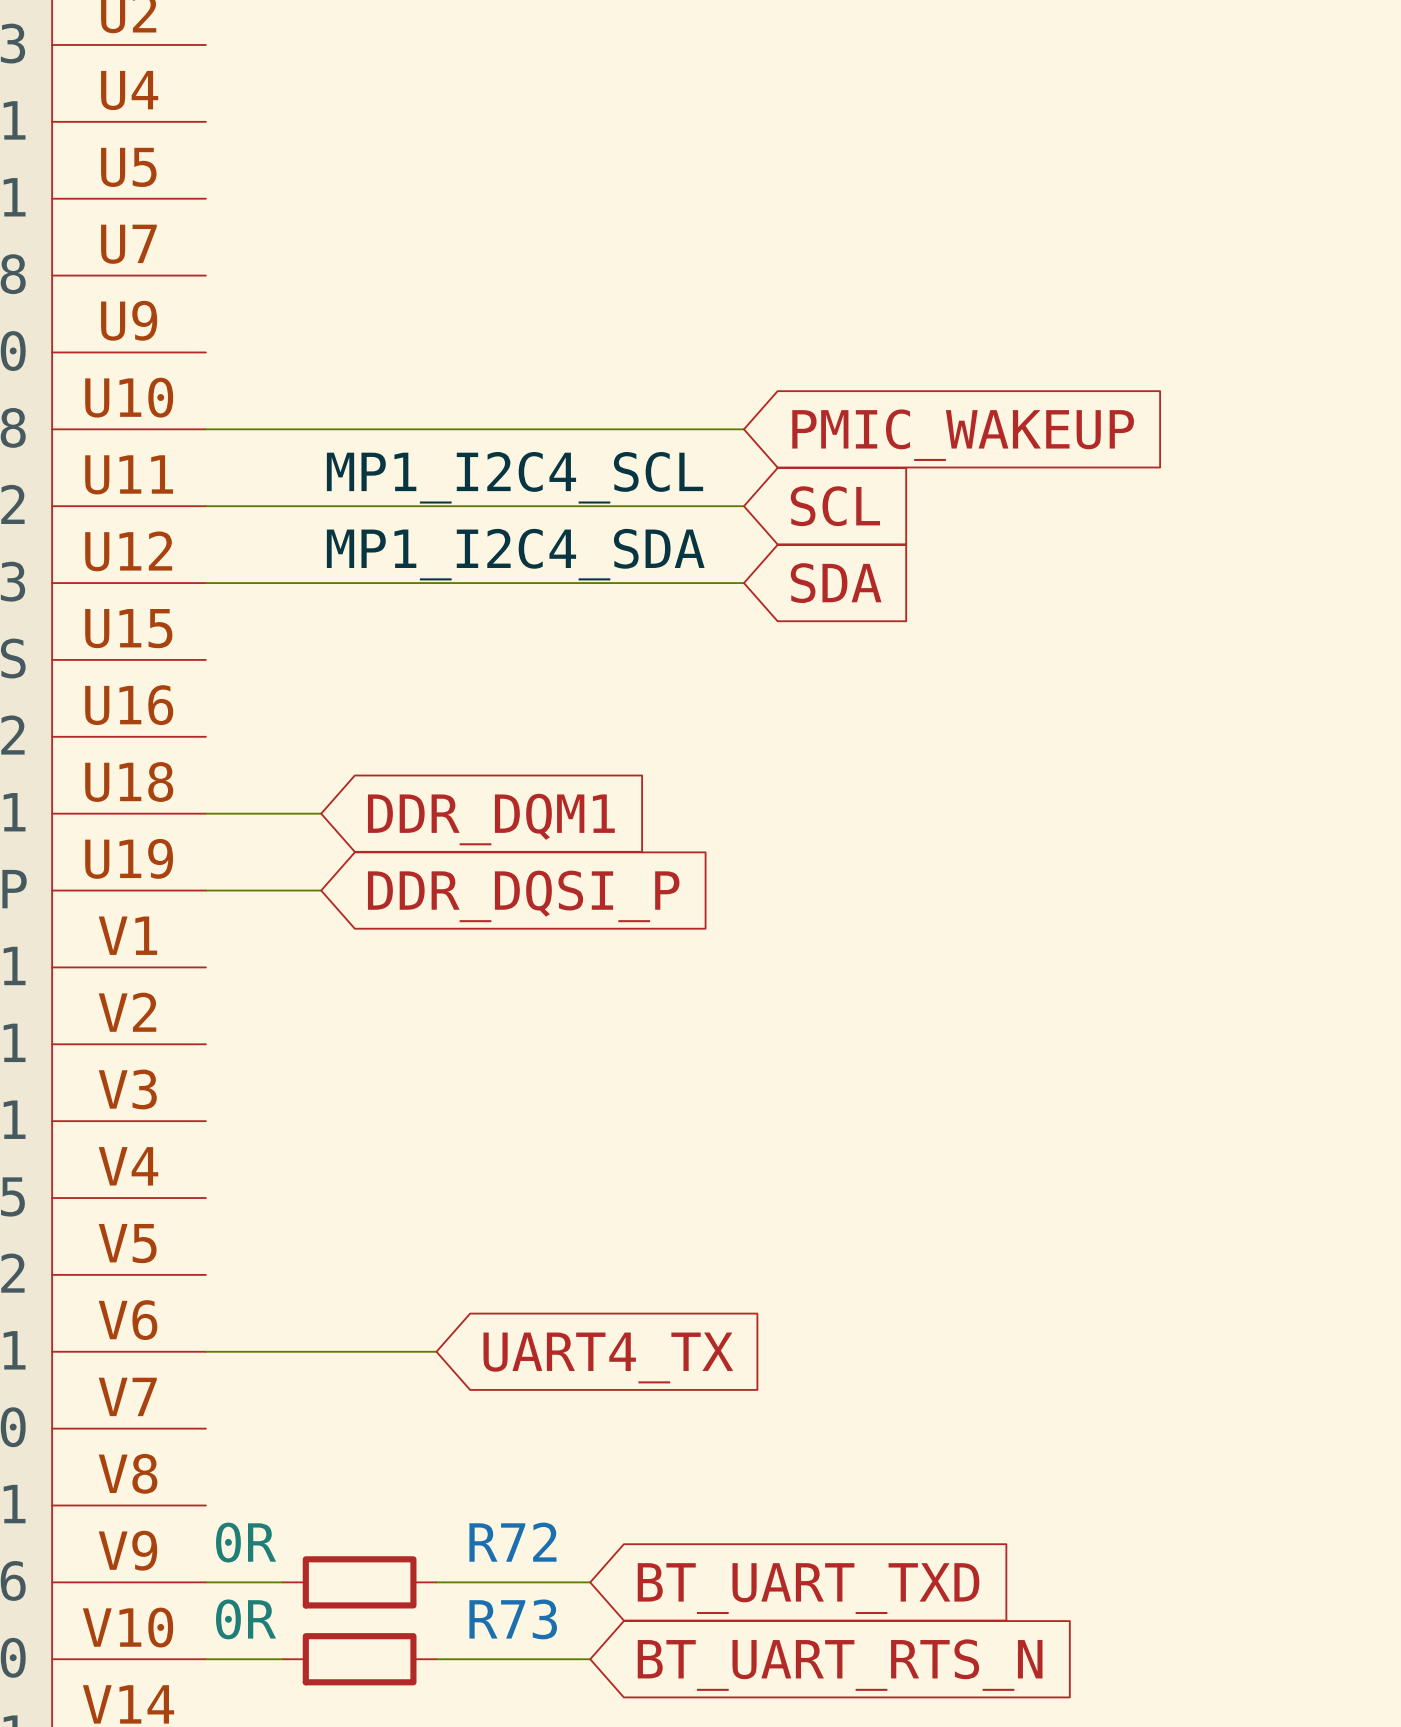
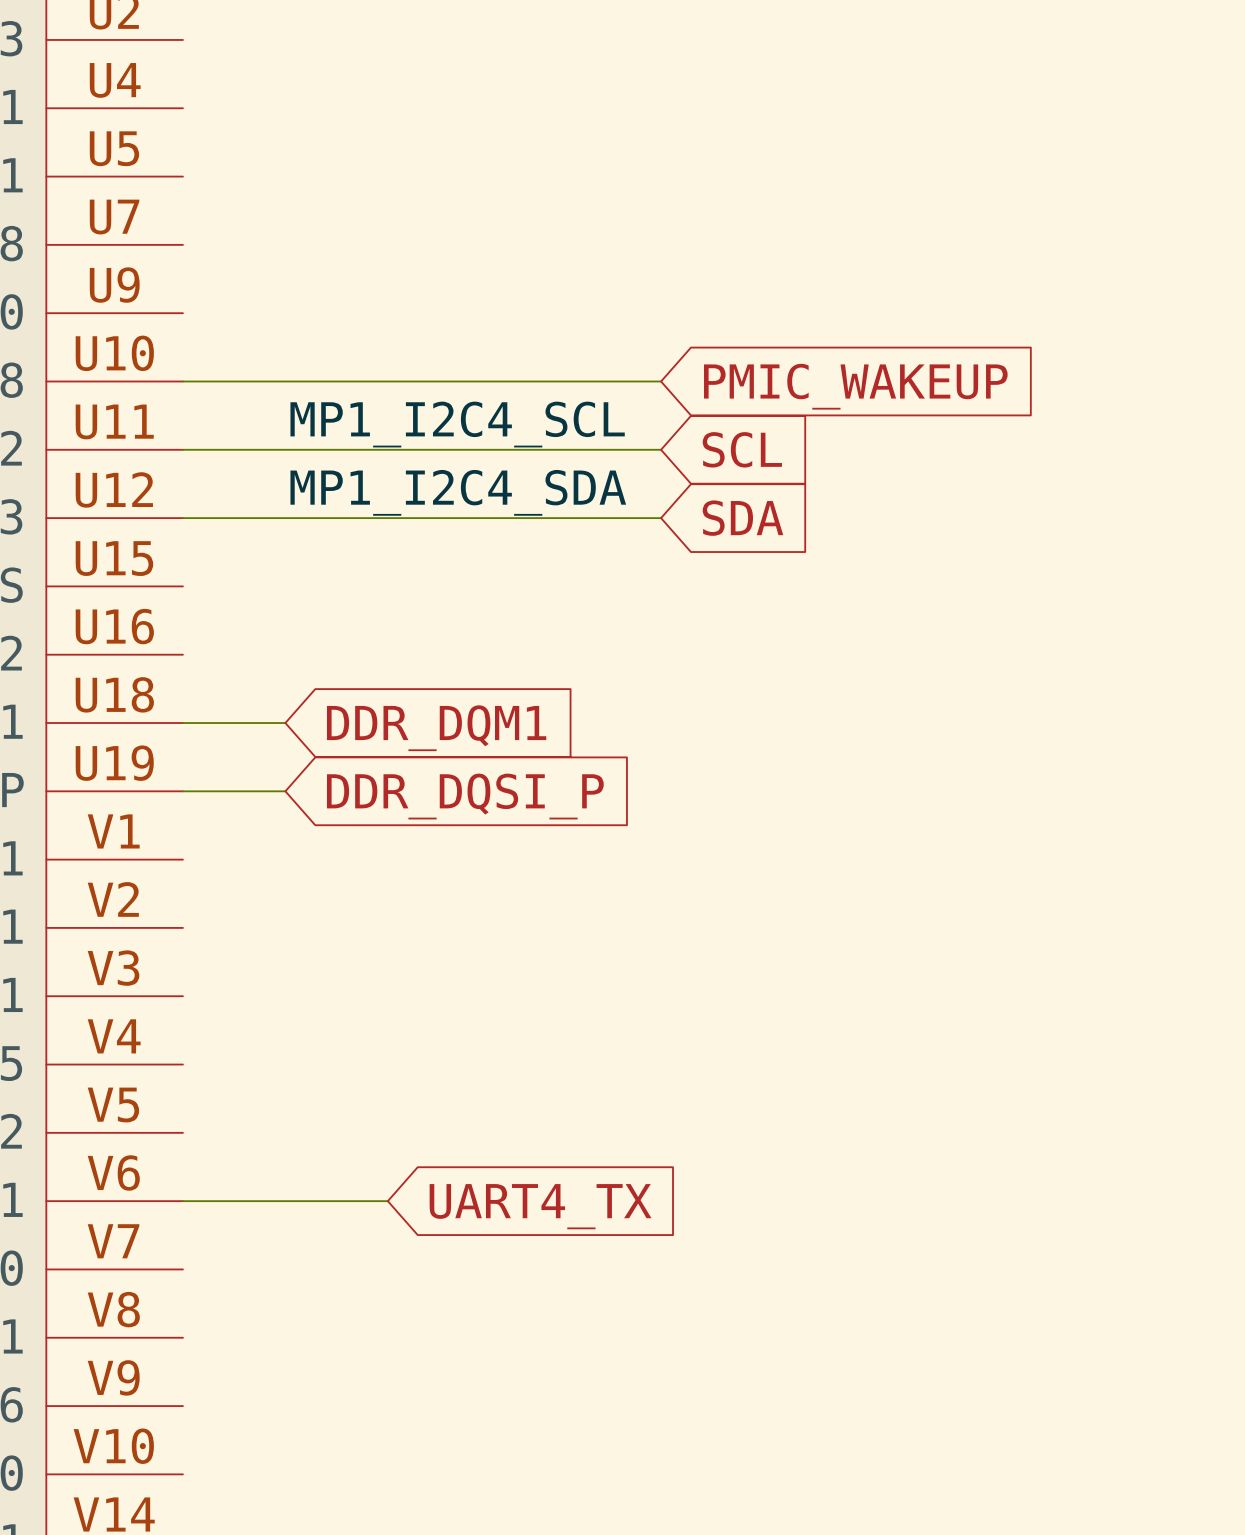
wire: (205, 1582) (282, 1582) -> none
R72: 0R (359, 1582) -> none
wire: (436, 1582) (590, 1582) -> none
global label: BT_UART_TXD (808, 1588) -> none
wire: (205, 1659) (282, 1659) -> none
R73: 0R (359, 1659) -> none
wire: (436, 1659) (590, 1659) -> none
global label: BT_UART_RTS_N (840, 1665) -> none

